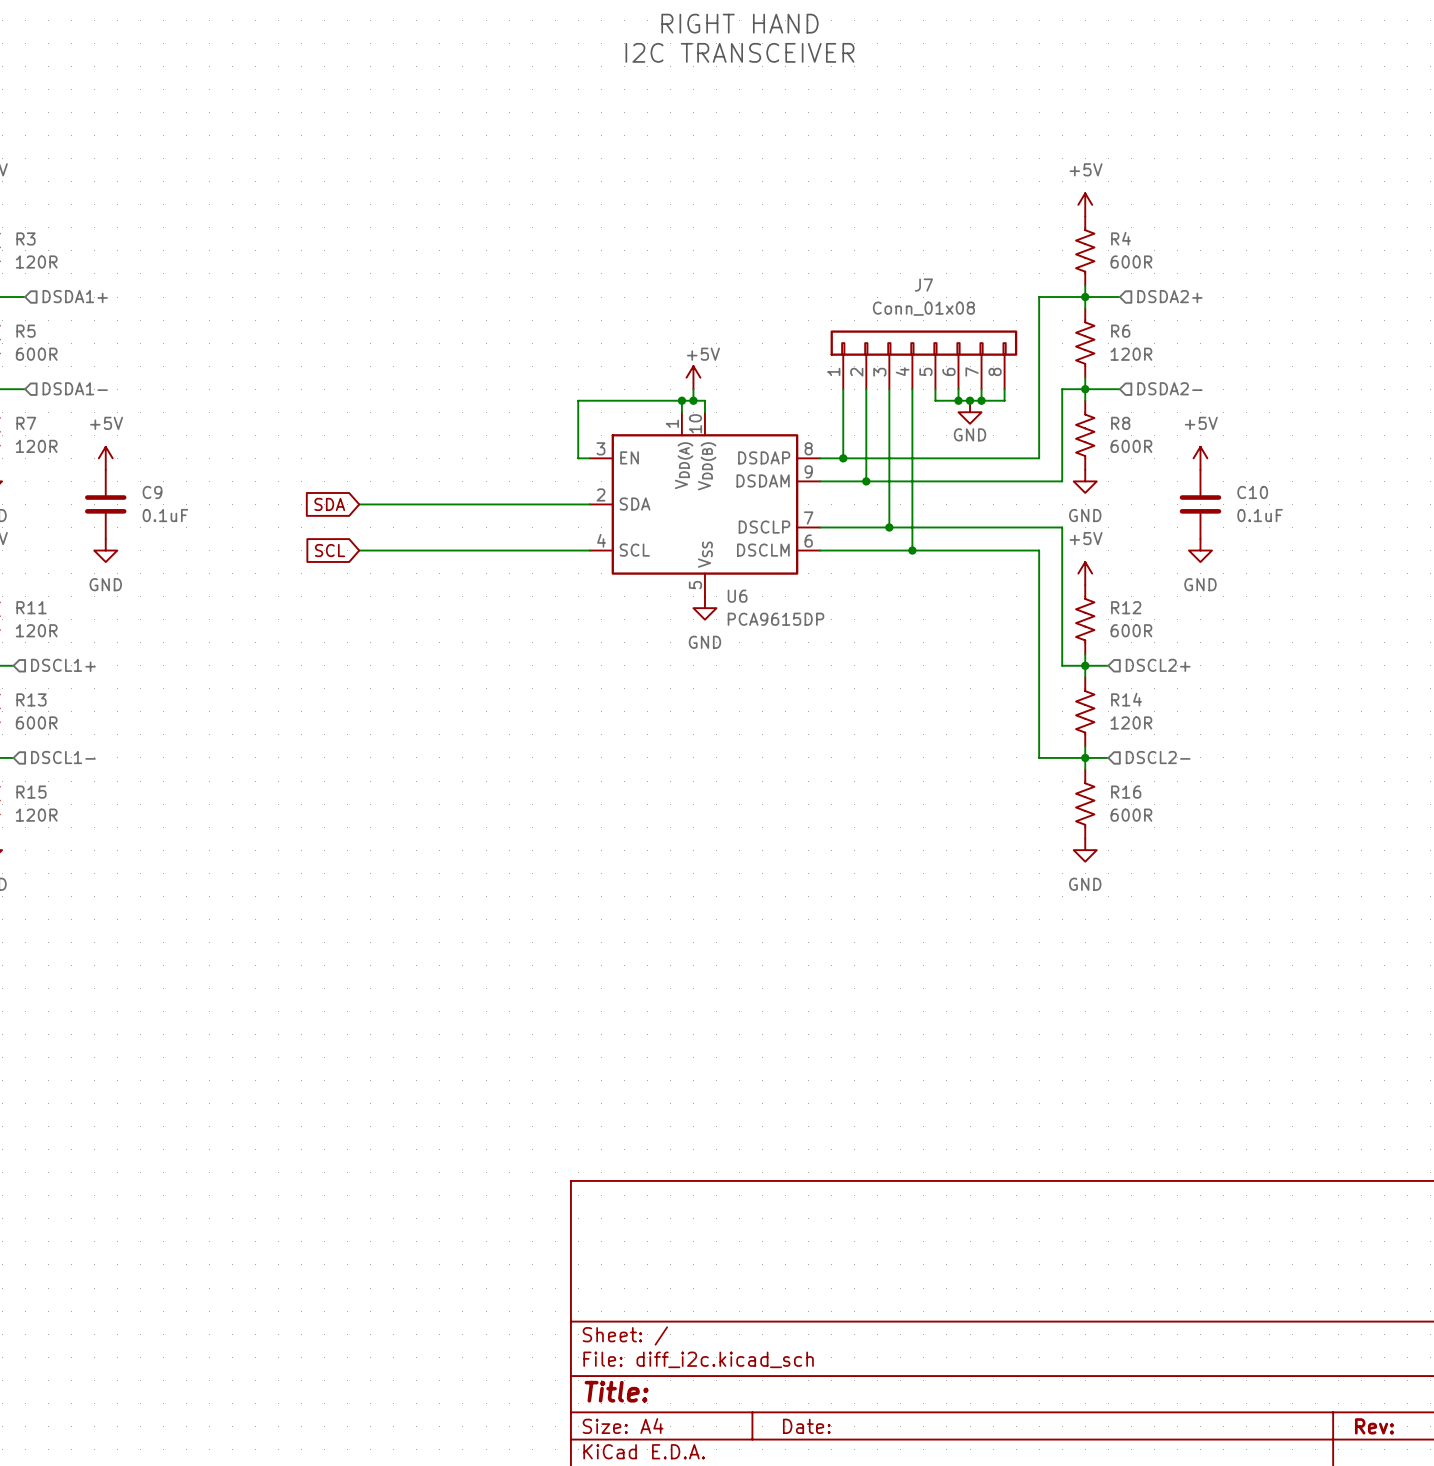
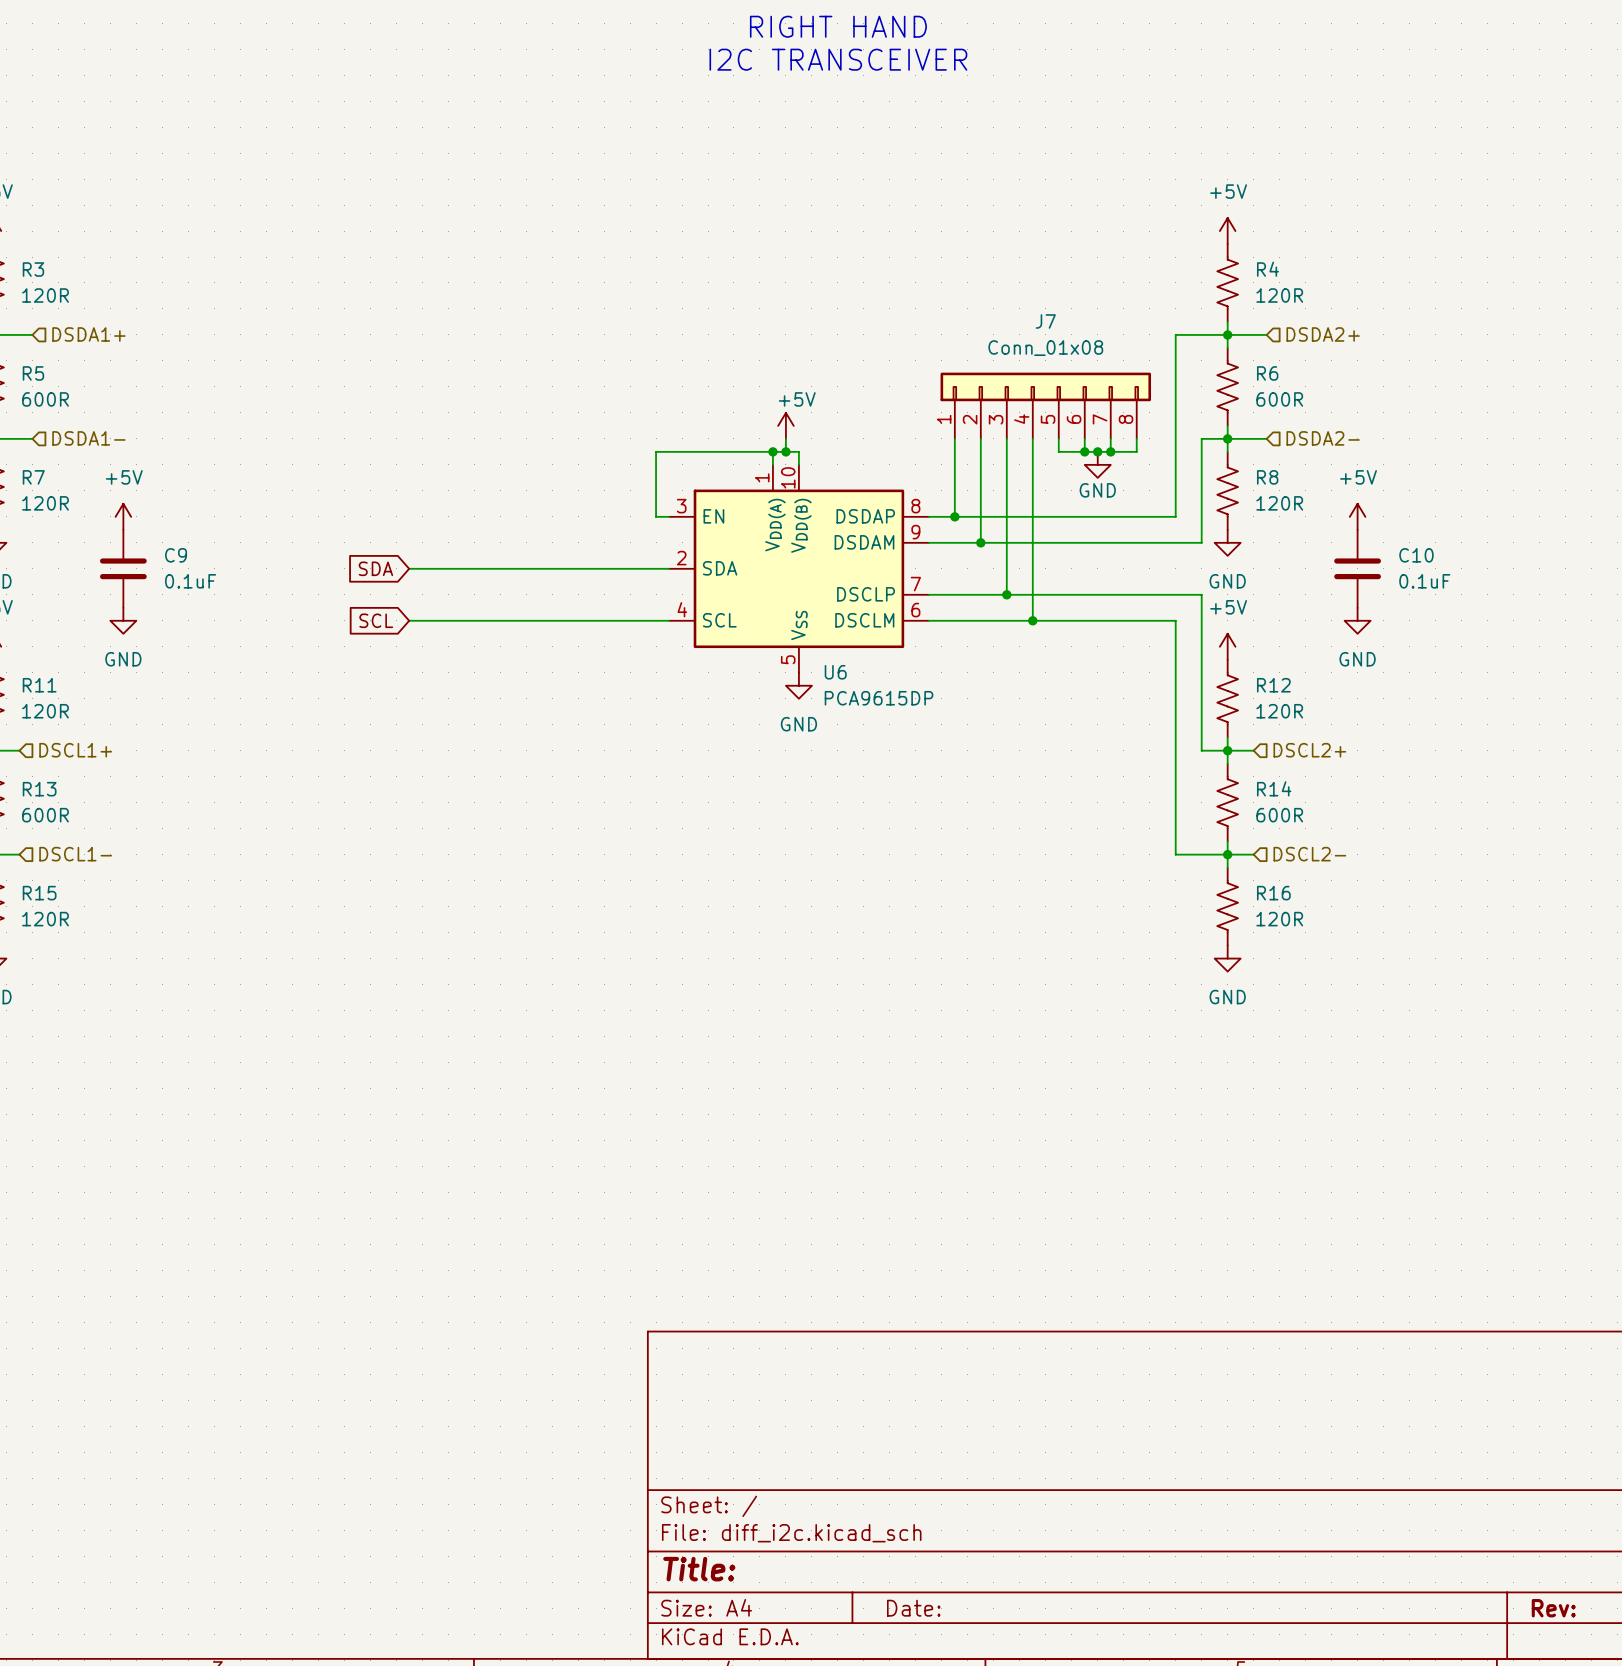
R4 value: 600R (1131, 262) -> 120R (1279, 295)
R6 value: 120R (1131, 354) -> 600R (1279, 399)
R8 value: 600R (1131, 446) -> 120R (1279, 503)
R12 value: 600R (1131, 630) -> 120R (1279, 711)
R14 value: 120R (1131, 722) -> 600R (1279, 815)
R16 value: 600R (1131, 815) -> 120R (1279, 919)

